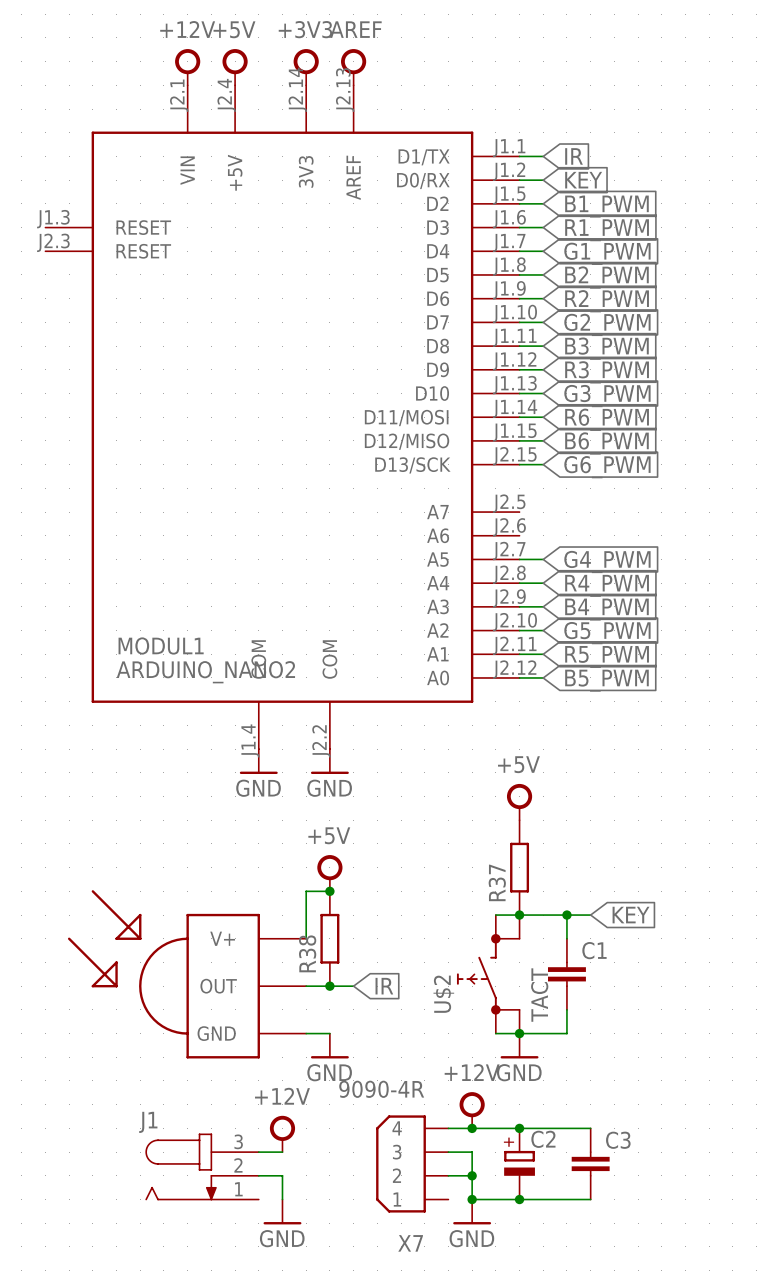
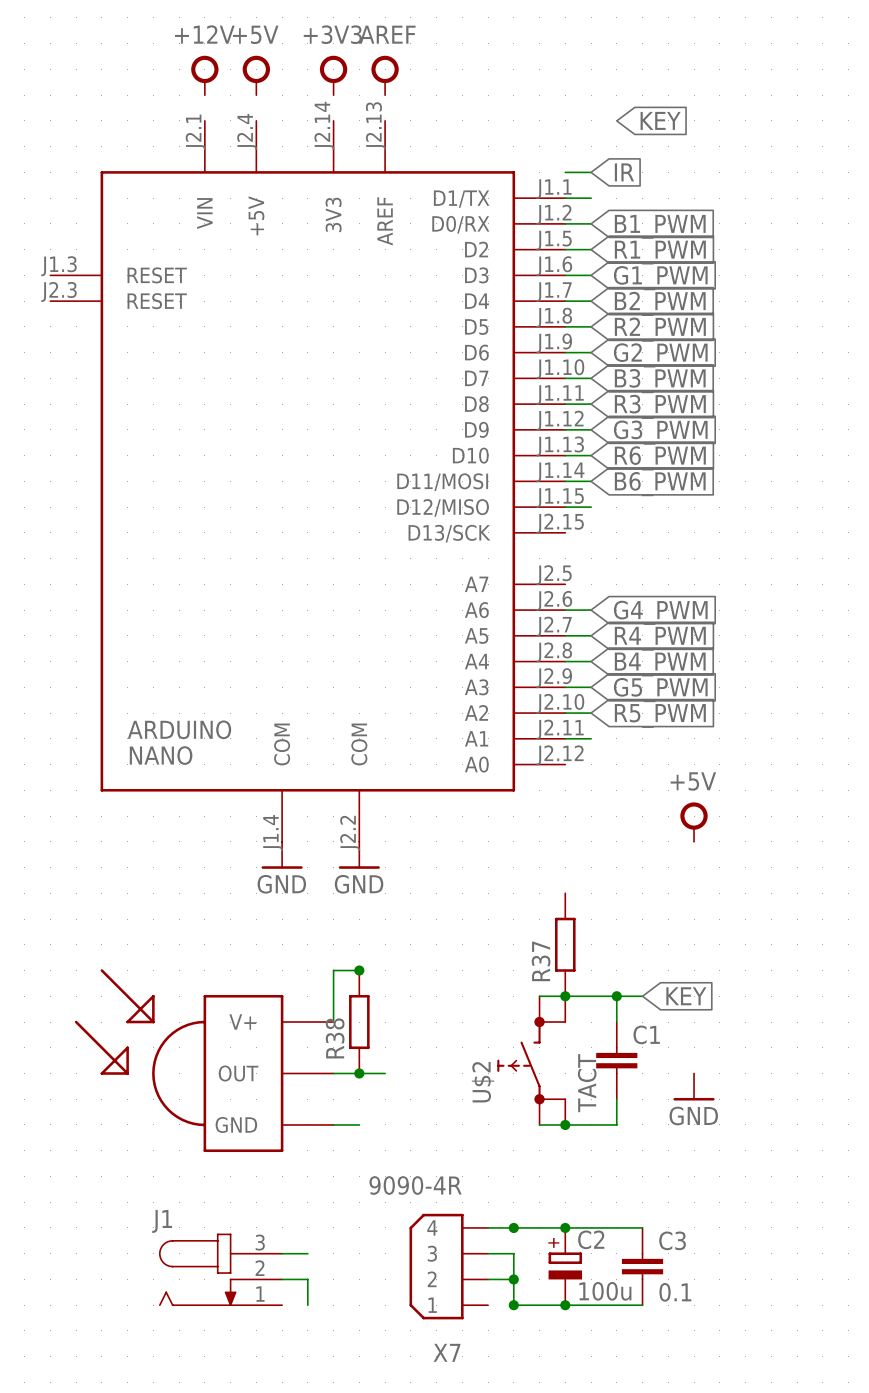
global label position: KEY (583, 180) -> KEY (660, 120)
MODUL1: ARDUINO_NANO2 (282, 417) -> none
ARDUINO: none -> NANO (307, 481)
global label: G6_PWM (607, 467) -> none
global label: B5_PWM (606, 680) -> none
power symbol position: GND (258, 761) -> GND (282, 855)
power symbol position: GND (329, 761) -> GND (359, 855)
power symbol position: +5V (519, 802) -> +5V (694, 822)
power symbol: +5V (329, 873) -> none
global label: IR (384, 986) -> none
power symbol: GND (329, 1046) -> none
power symbol position: GND (519, 1046) -> GND (694, 1087)
power symbol: +12V (472, 1110) -> none
power symbol: +12V (282, 1134) -> none
C2 value: none -> 100u (605, 1291)
C3 value: none -> 0.1 (675, 1292)
power symbol: GND (282, 1211) -> none
power symbol: GND (472, 1211) -> none

